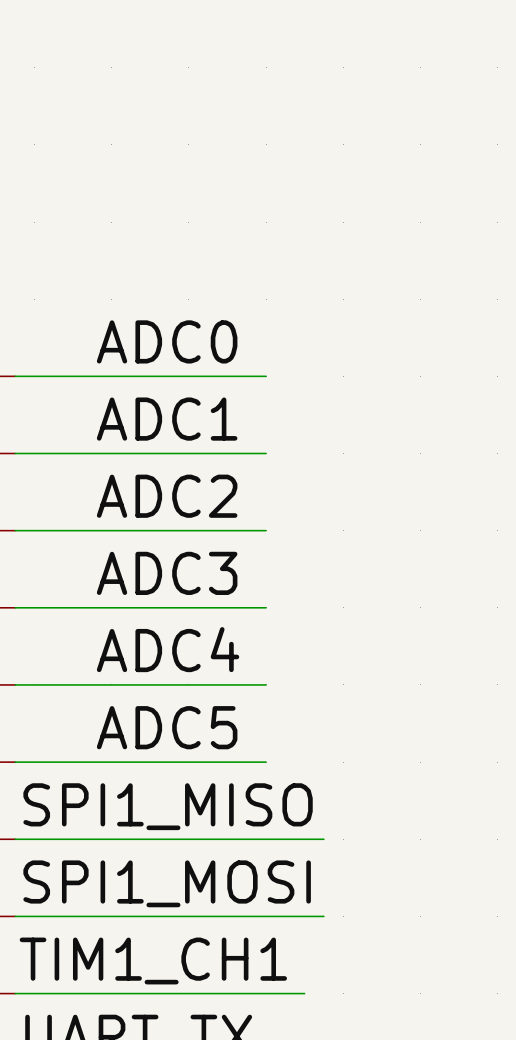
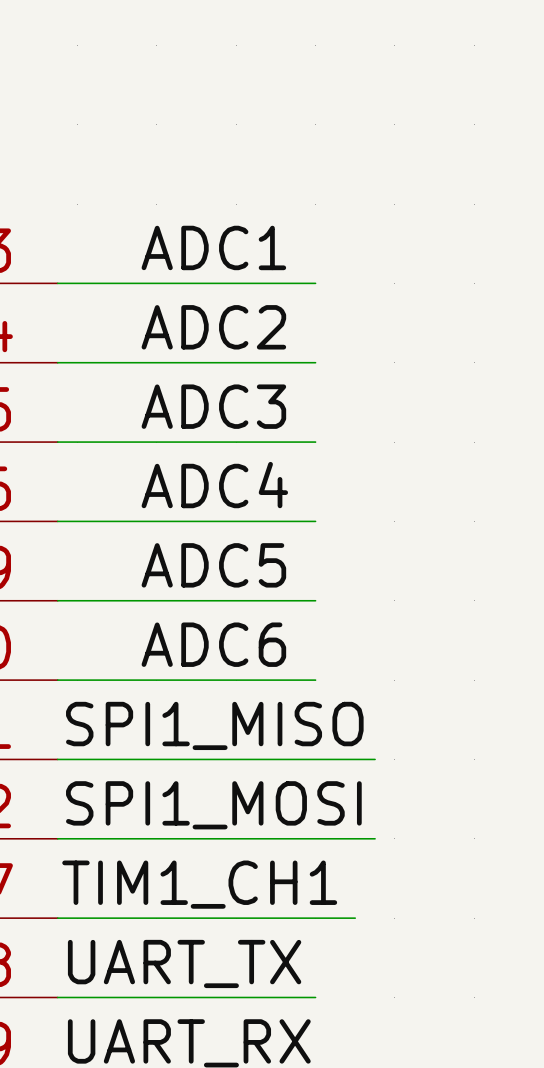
label: ADC0 (167, 341) -> ADC1 (213, 247)
label: ADC1 (167, 419) -> ADC2 (213, 327)
label: ADC2 (167, 496) -> ADC3 (213, 406)
label: ADC3 (167, 573) -> ADC4 (214, 485)
label: ADC4 (168, 649) -> ADC5 (213, 565)
label: ADC5 (167, 727) -> ADC6 (213, 644)

